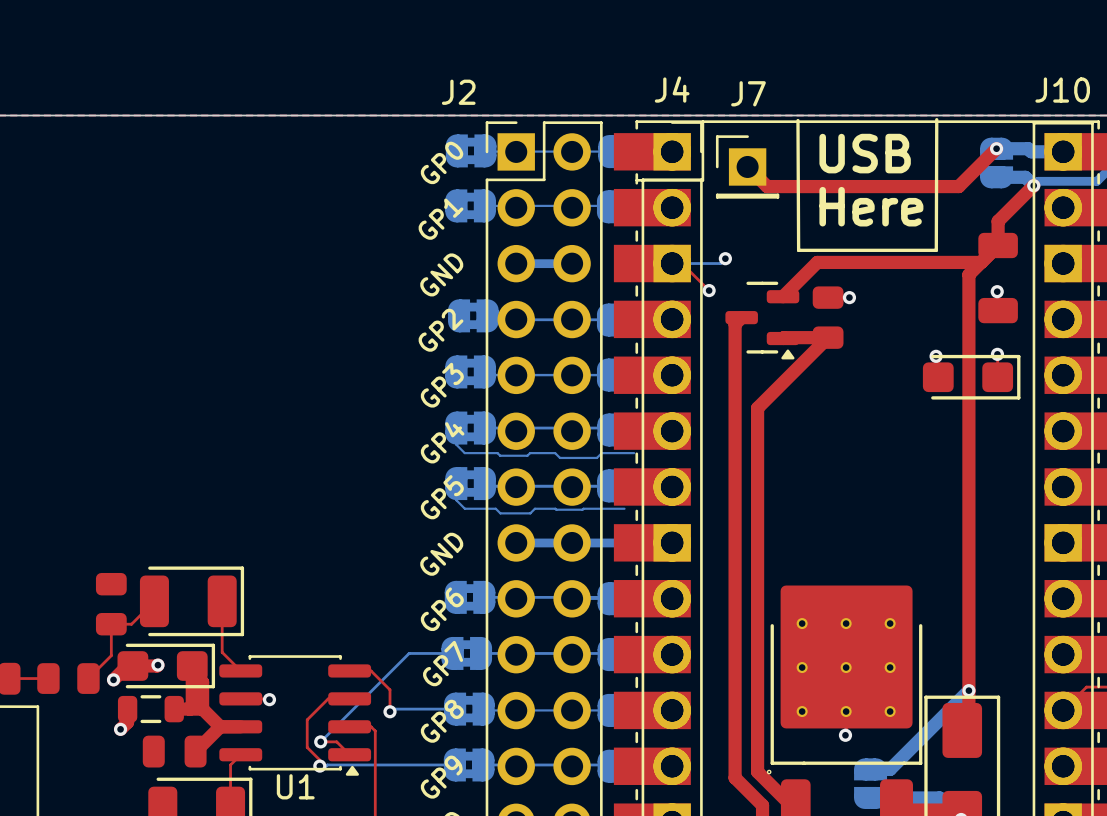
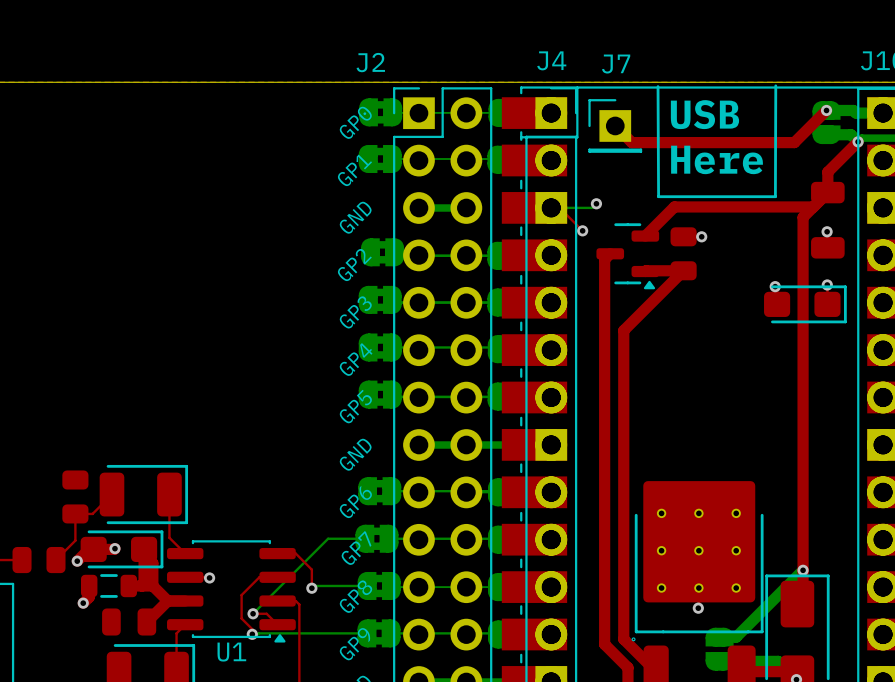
bottom track: (456, 428) (456, 444) (464, 453) (497, 453) (500, 455) (555, 453) (560, 457) (596, 457) (601, 453) (634, 453) -> none
bottom track: (456, 483) (456, 500) (464, 508) (495, 508) (500, 513) (530, 513) (534, 508) (624, 508) -> none

